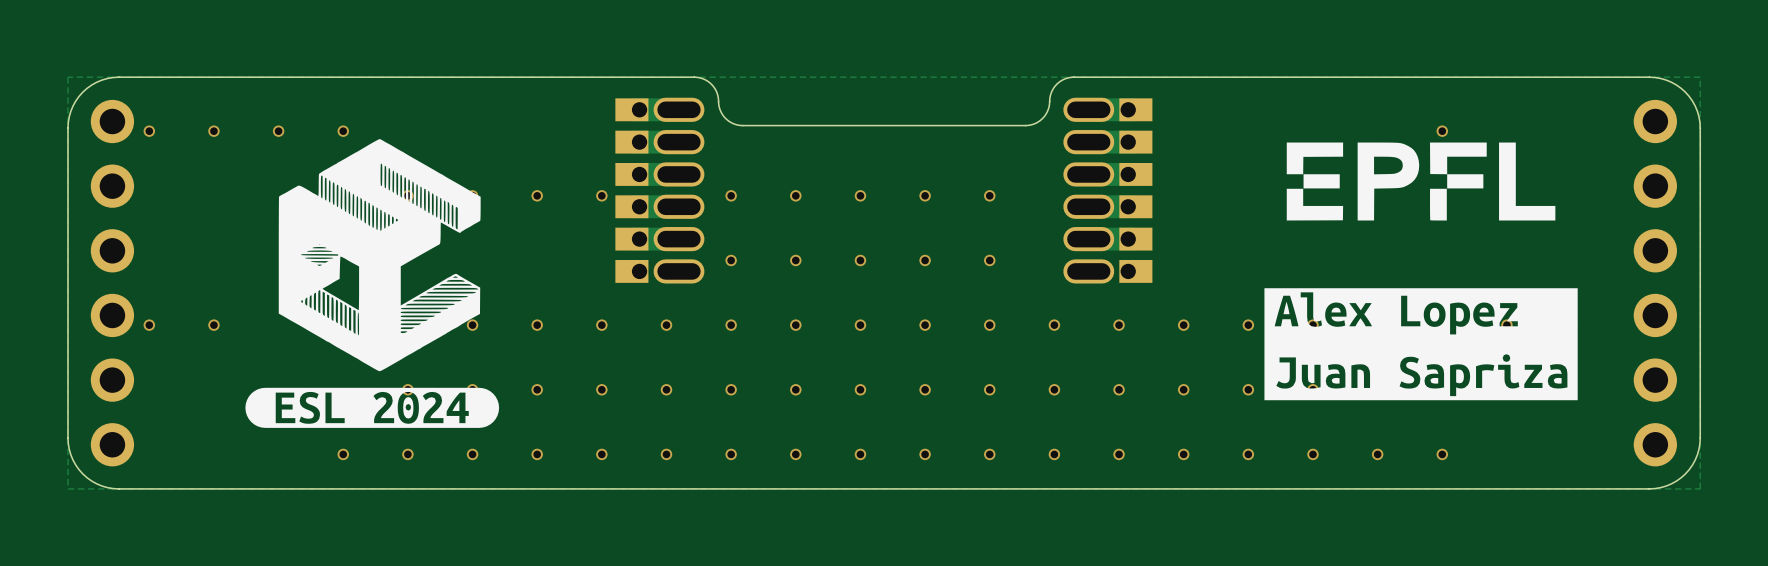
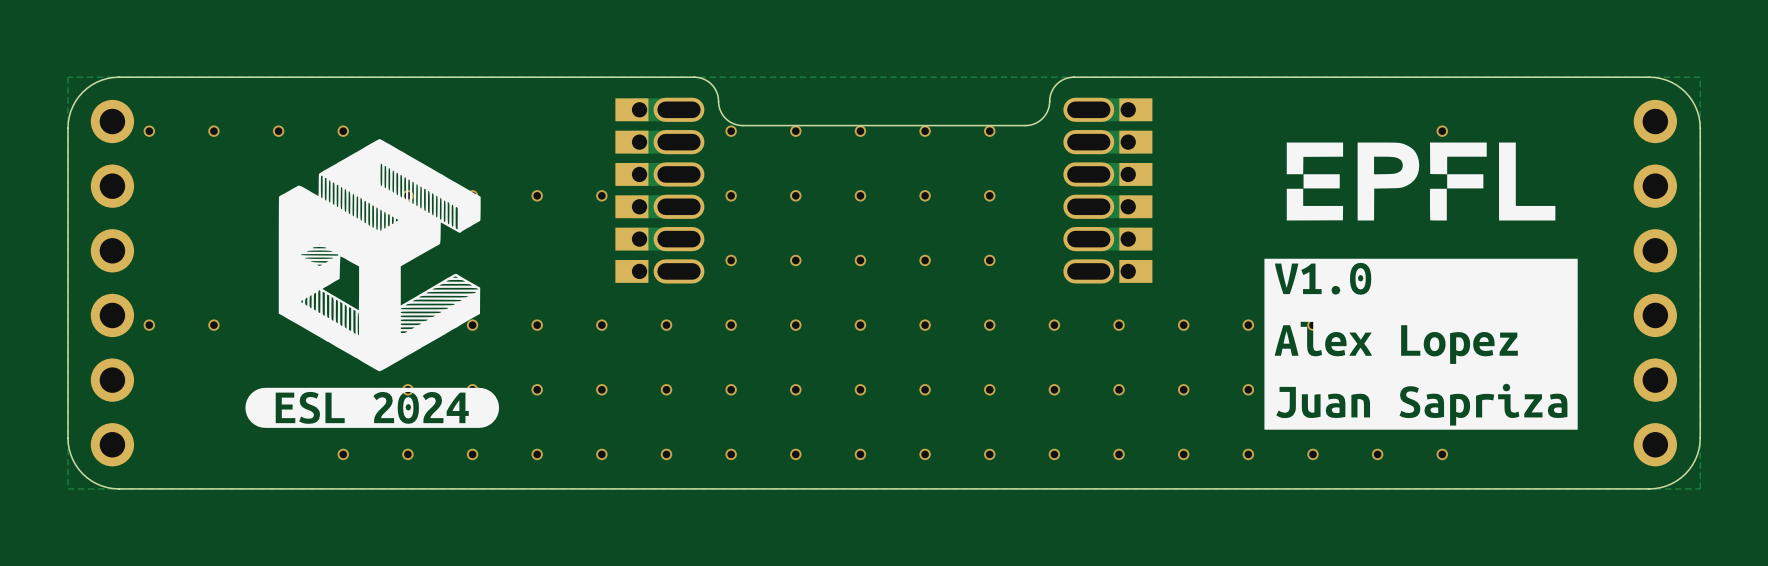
via: none -> (731, 131)
via: none -> (795, 131)
via: none -> (860, 131)
via: none -> (925, 131)
via: none -> (989, 131)
drawing shape: [1264, 288, 1578, 401] -> [1264, 258, 1578, 430]

